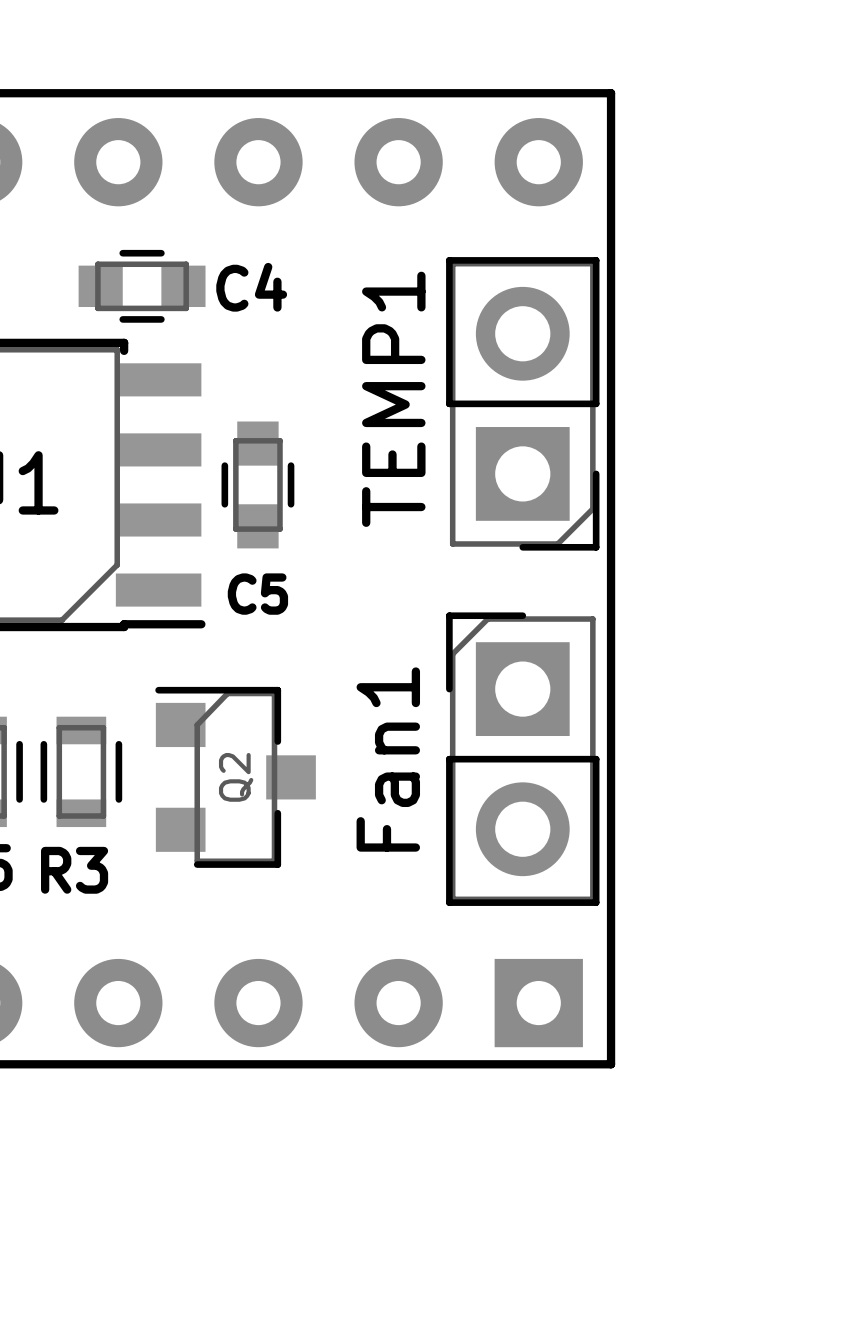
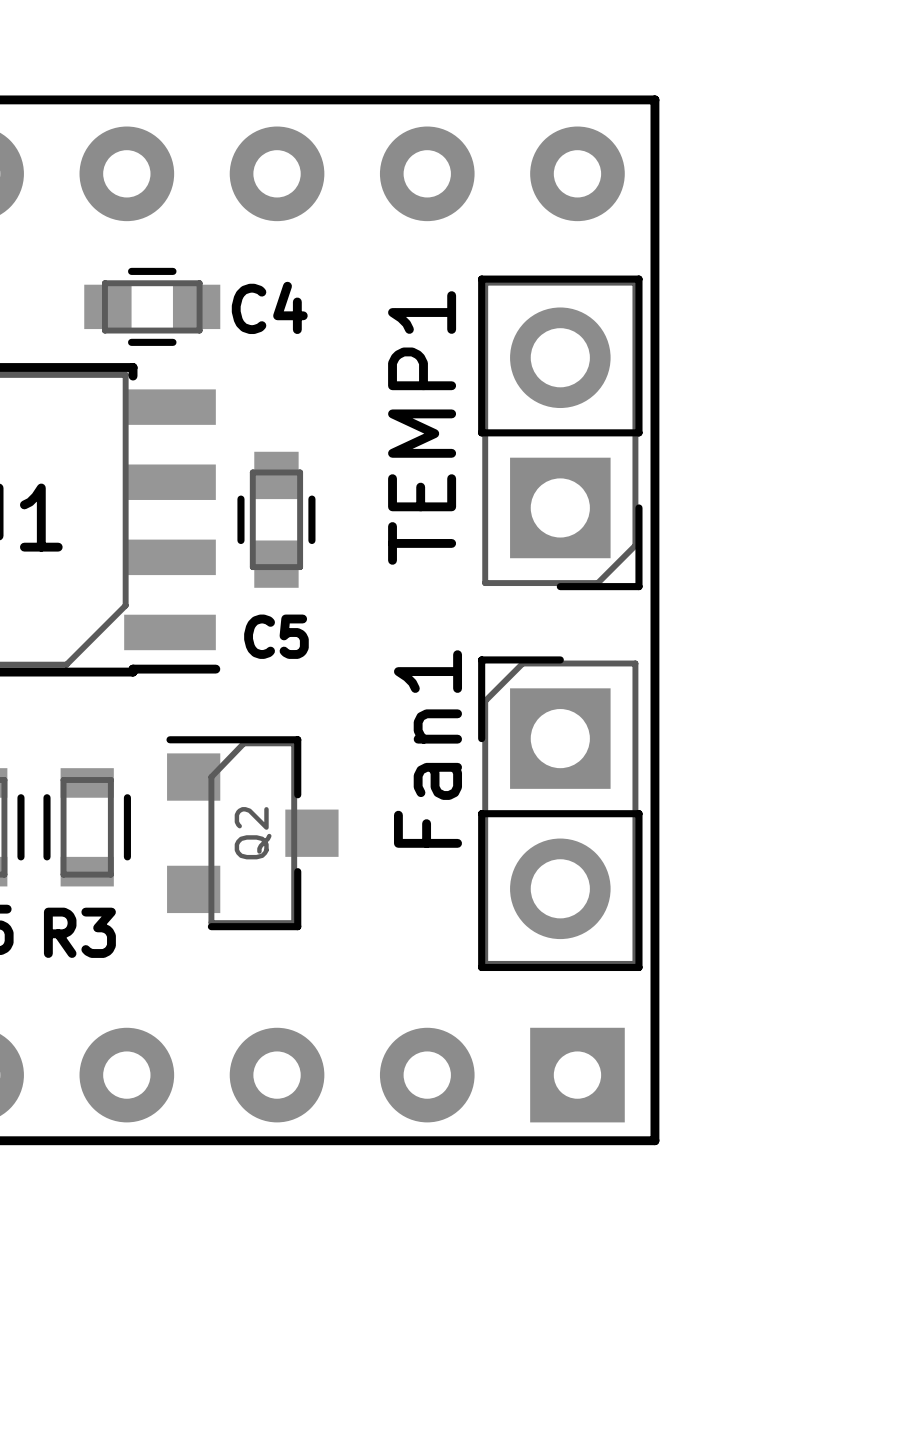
Fan1 name position: Fan1 (388, 759) -> Fan1 (428, 749)

